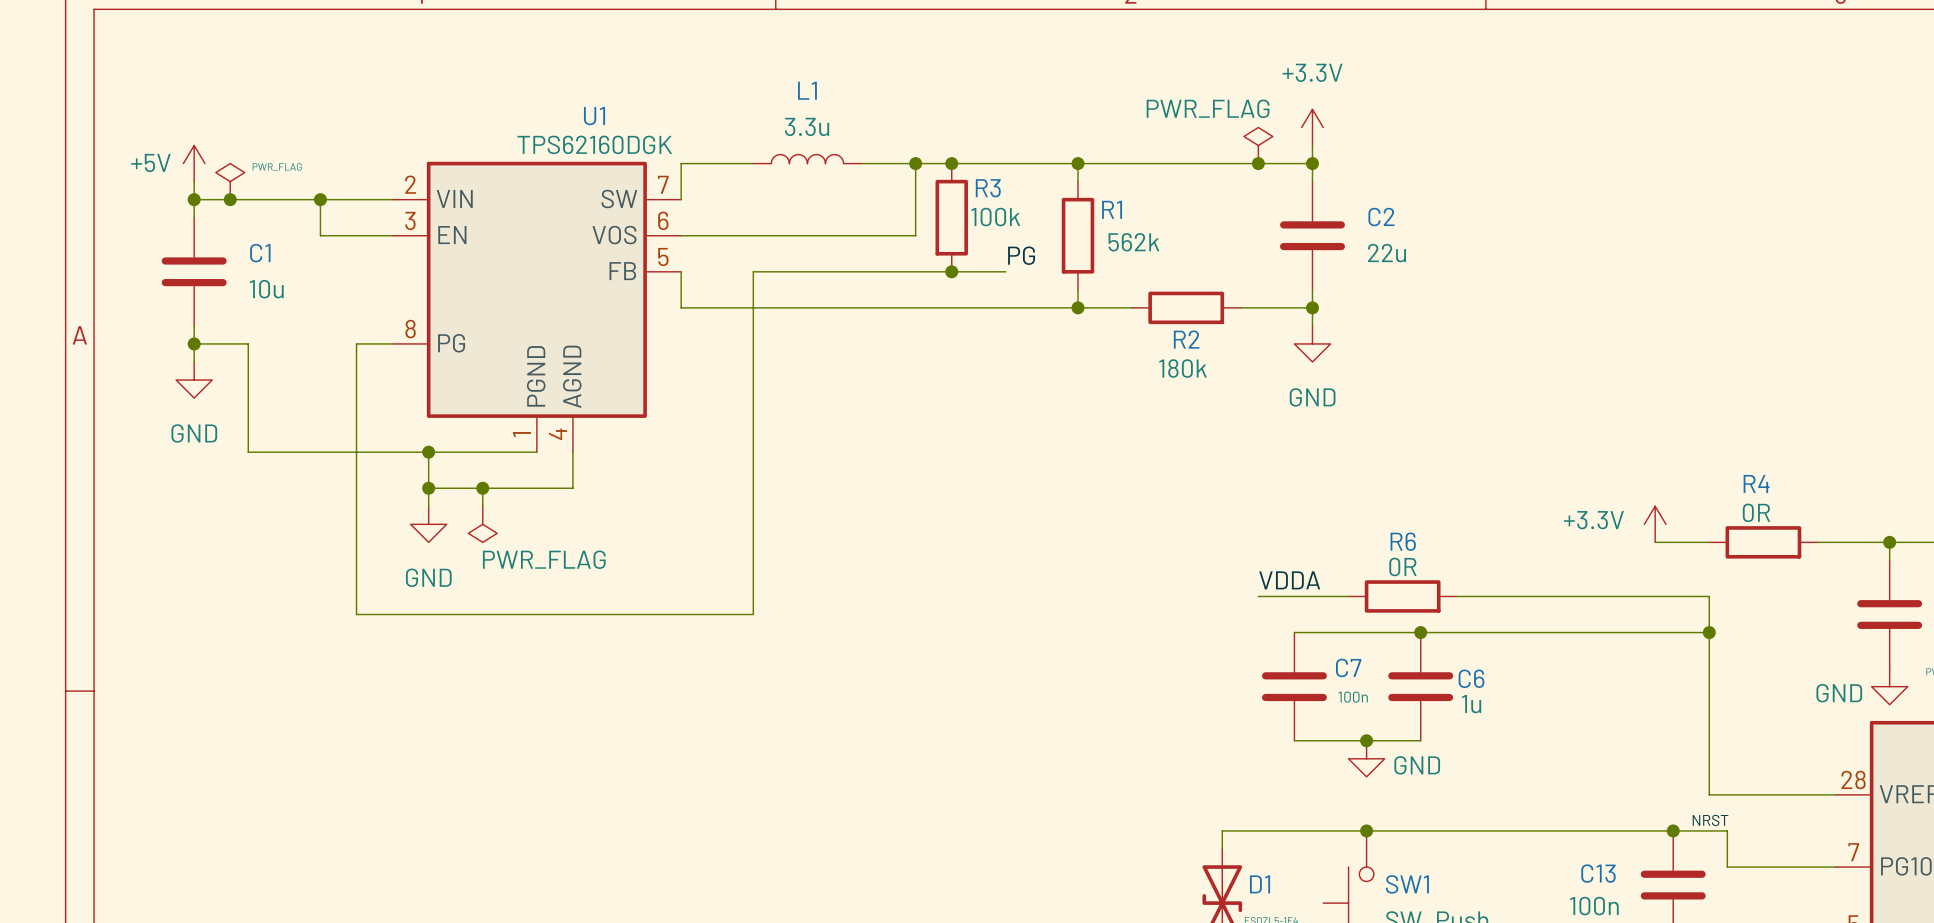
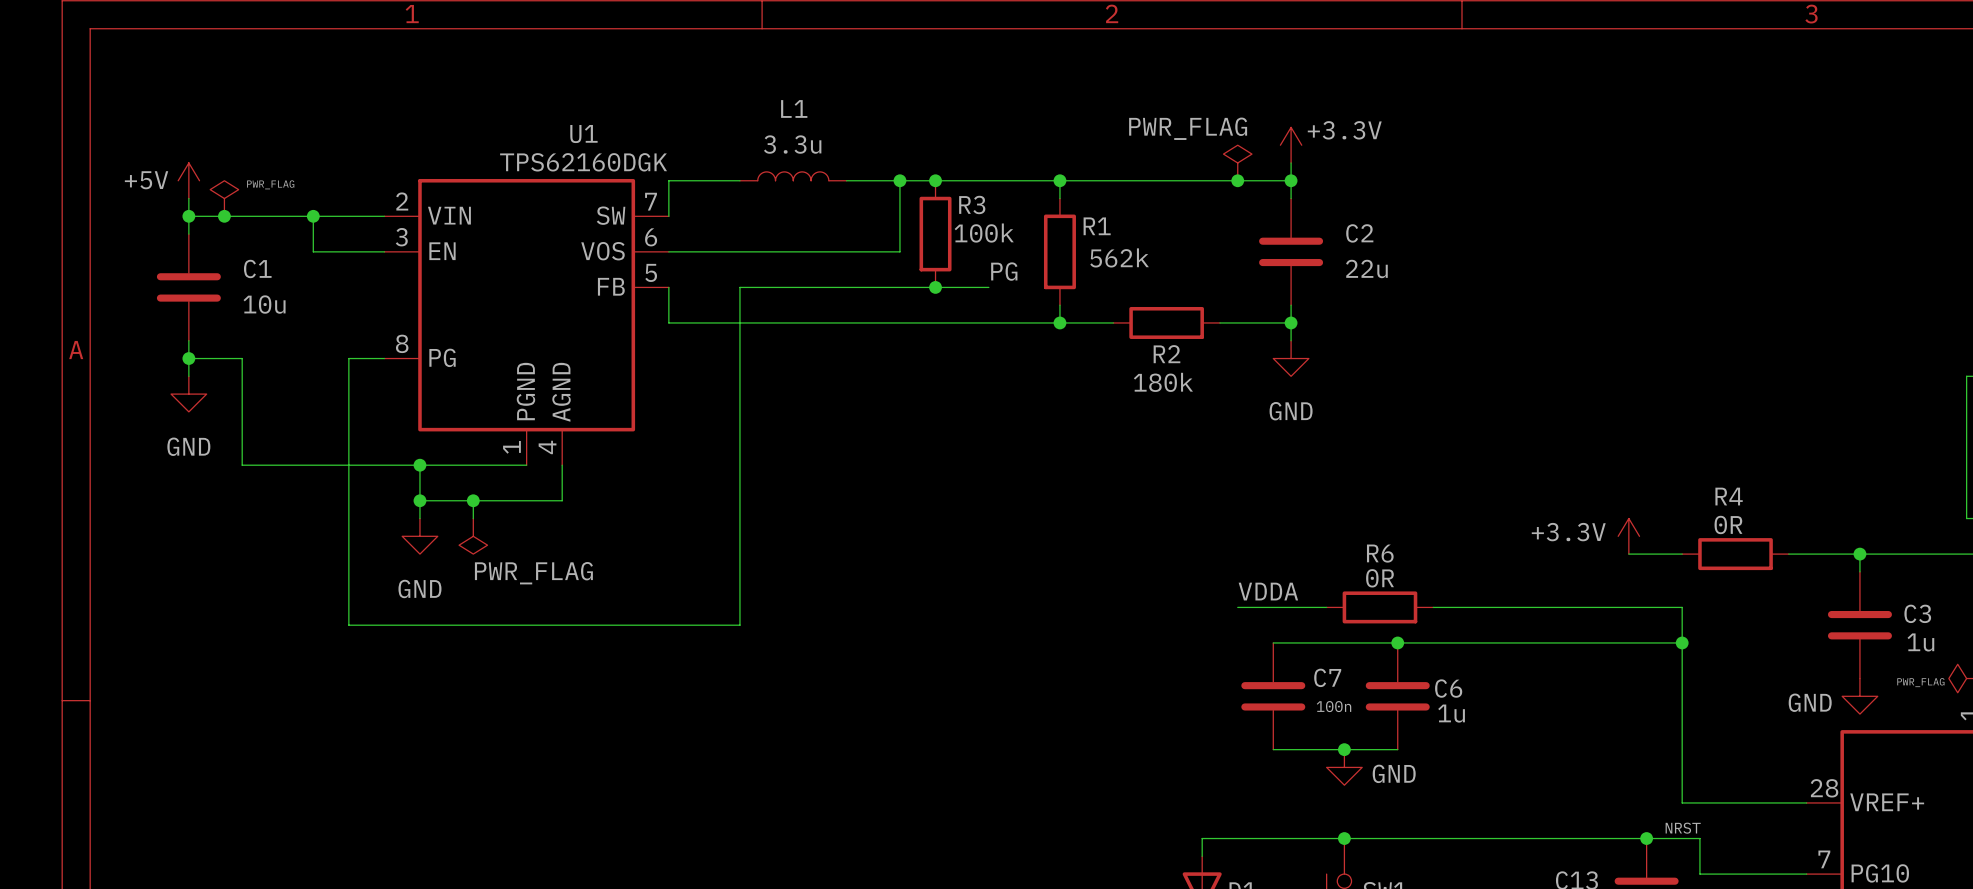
power symbol text position: +3.3V (1312, 72) -> +3.3V (1344, 130)

